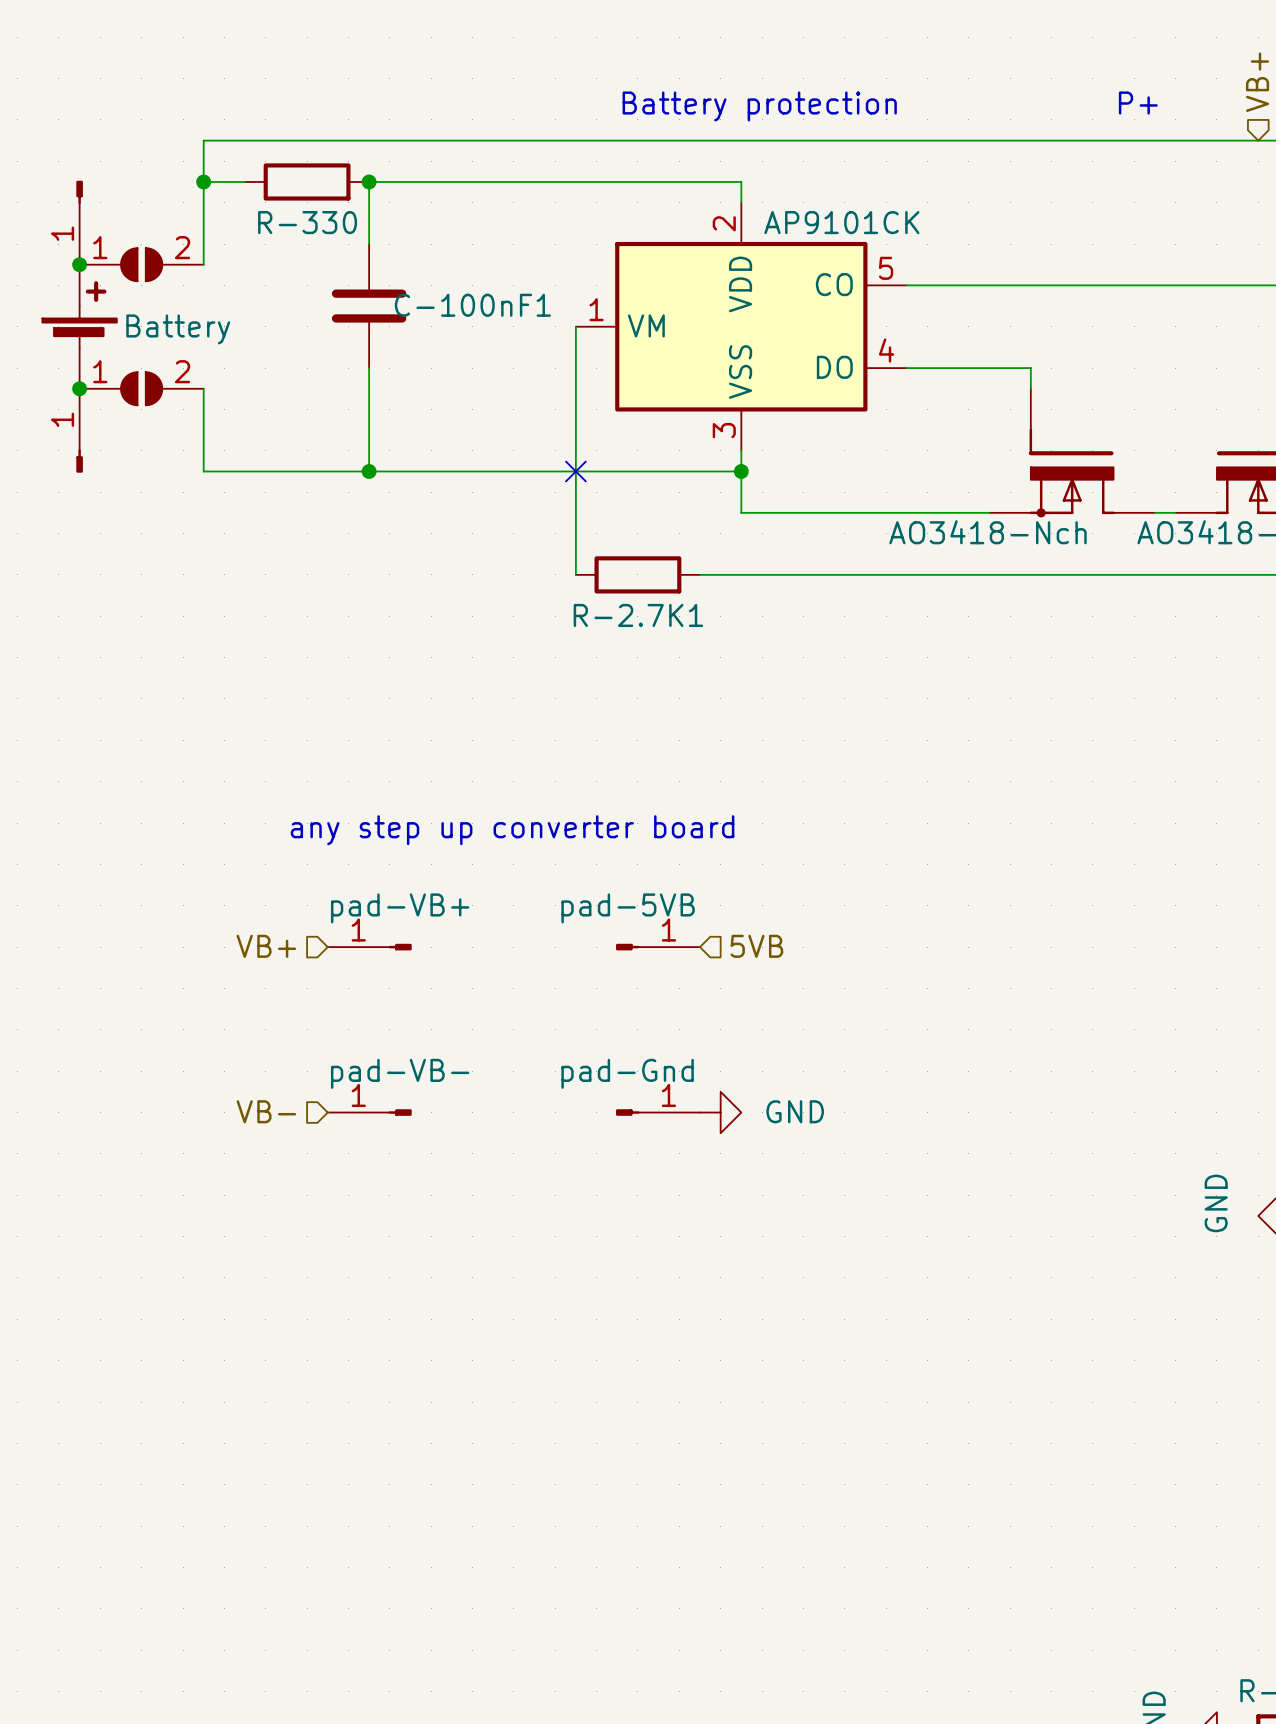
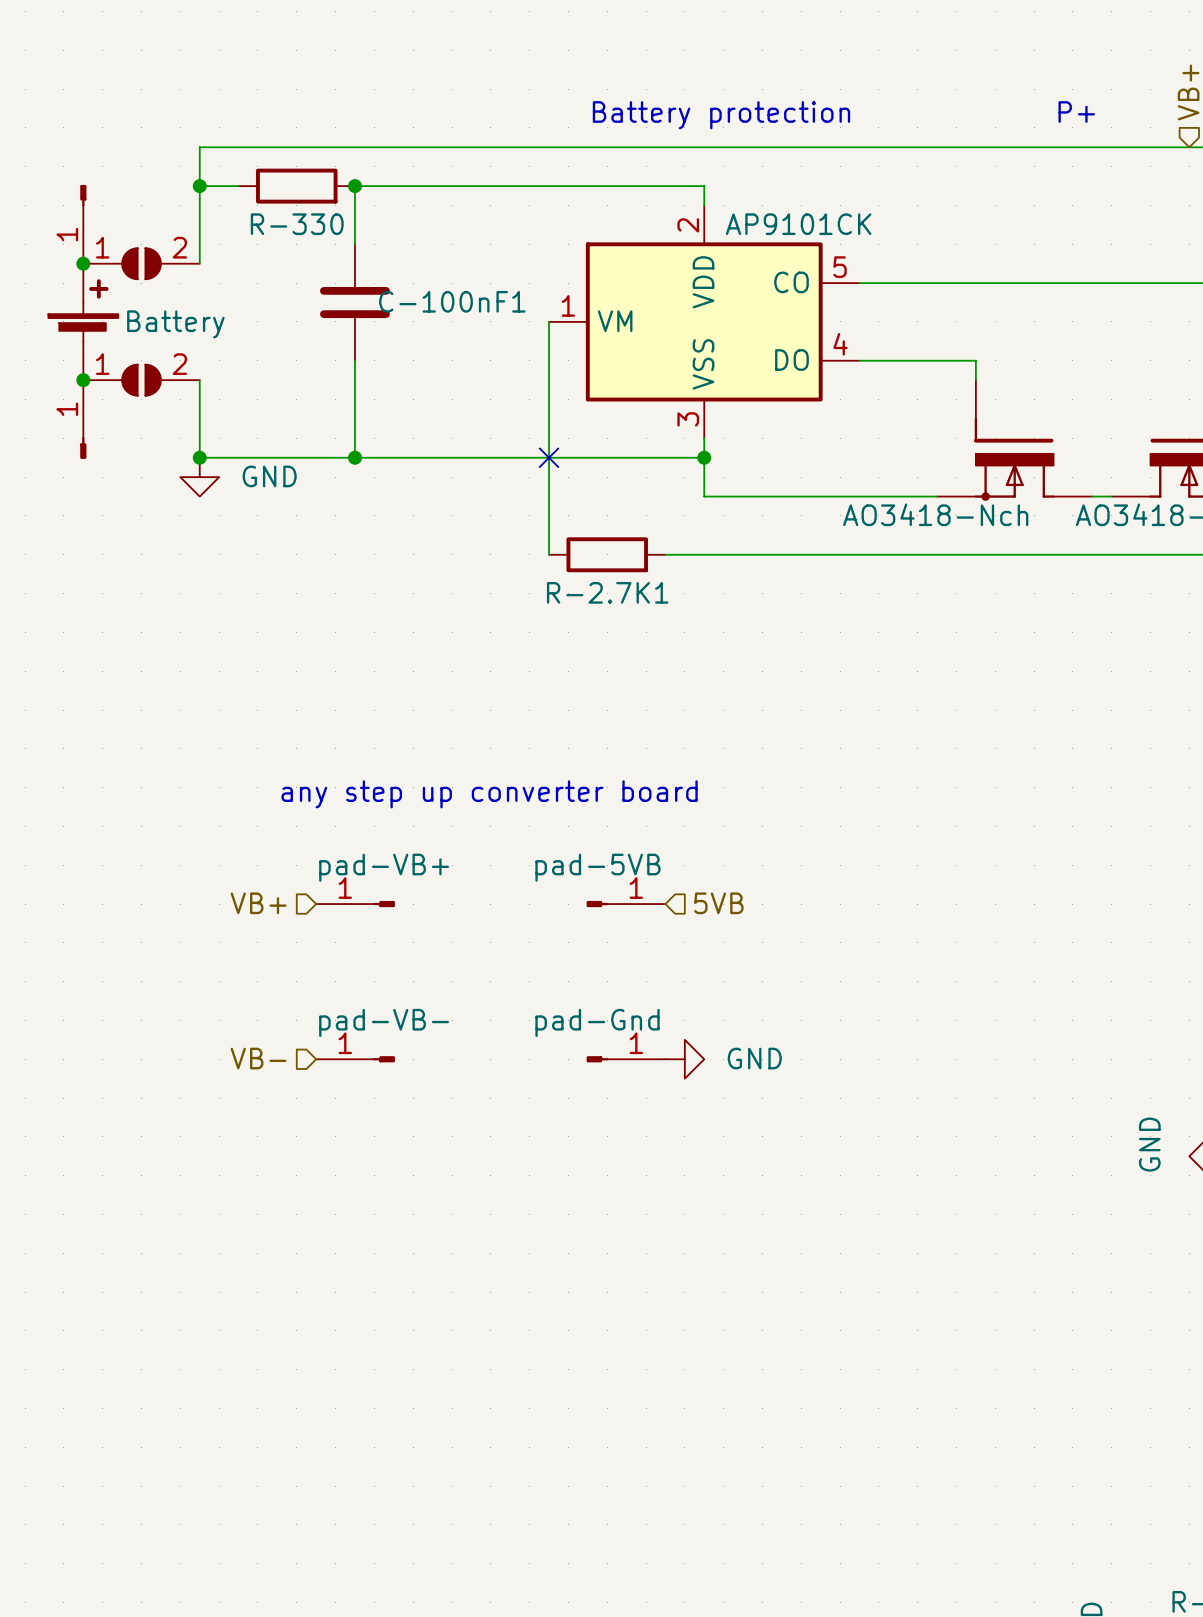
junction: none -> (199, 457)
power symbol: none -> GND (199, 477)

